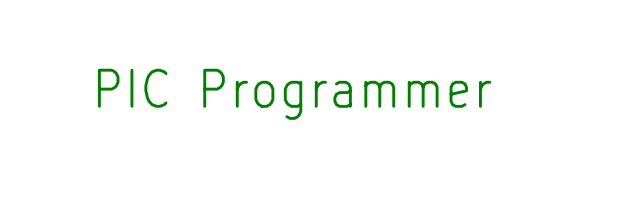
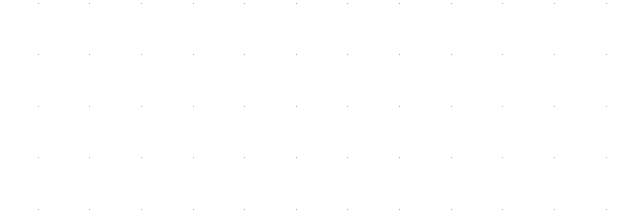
text: PIC Programmer (294, 94) -> none

